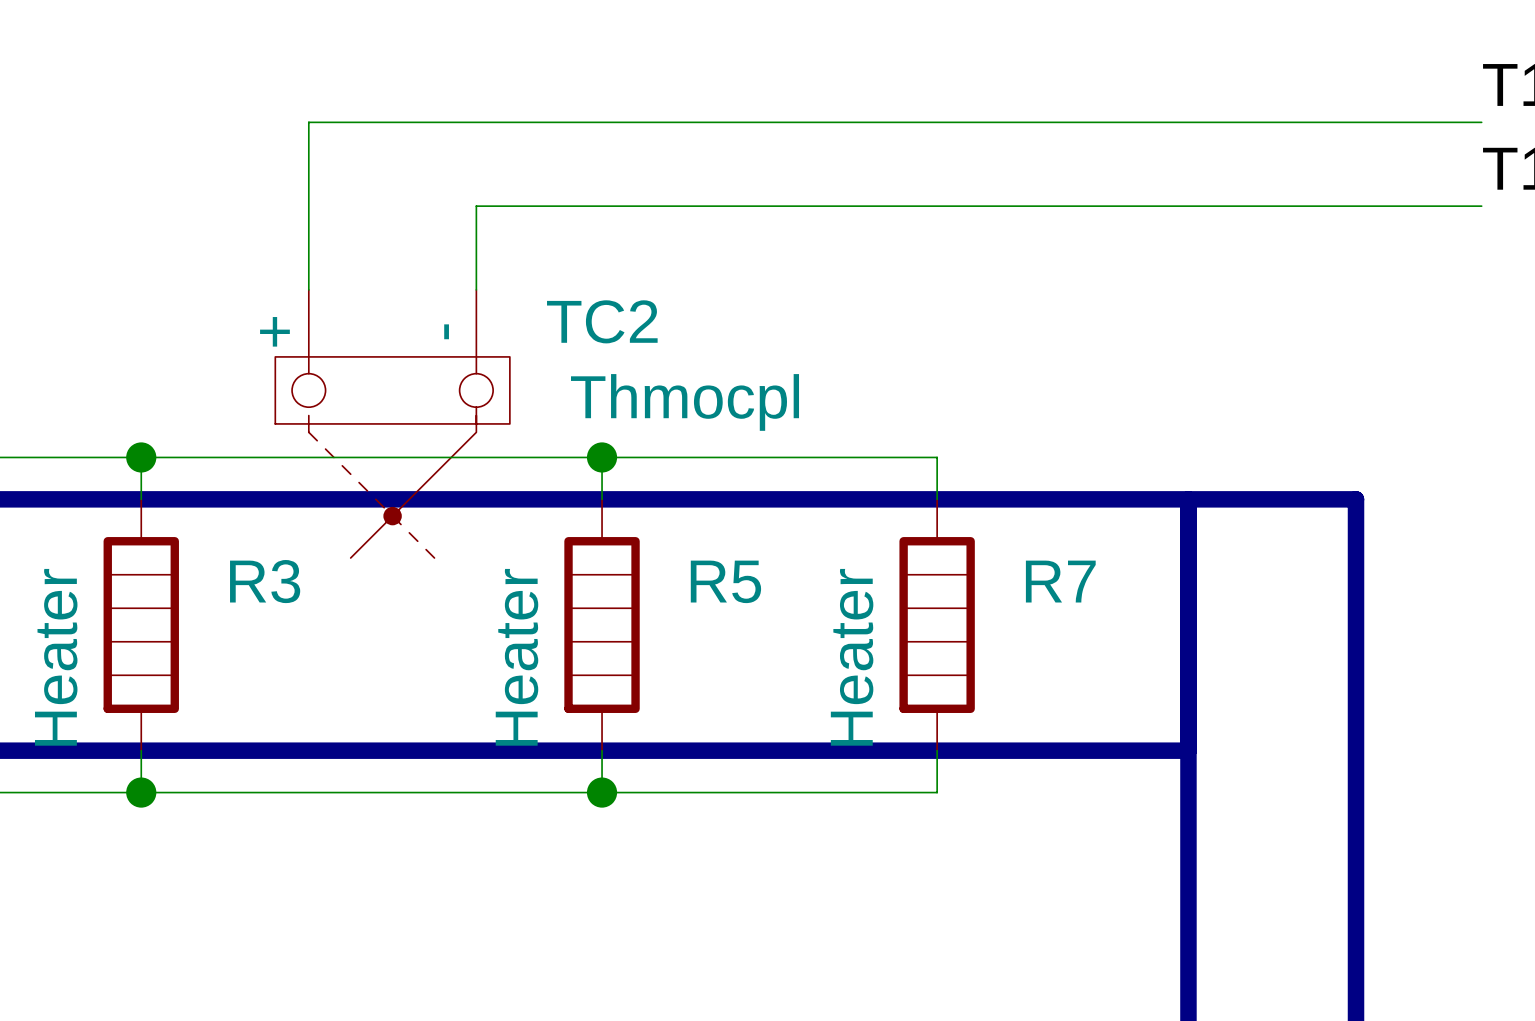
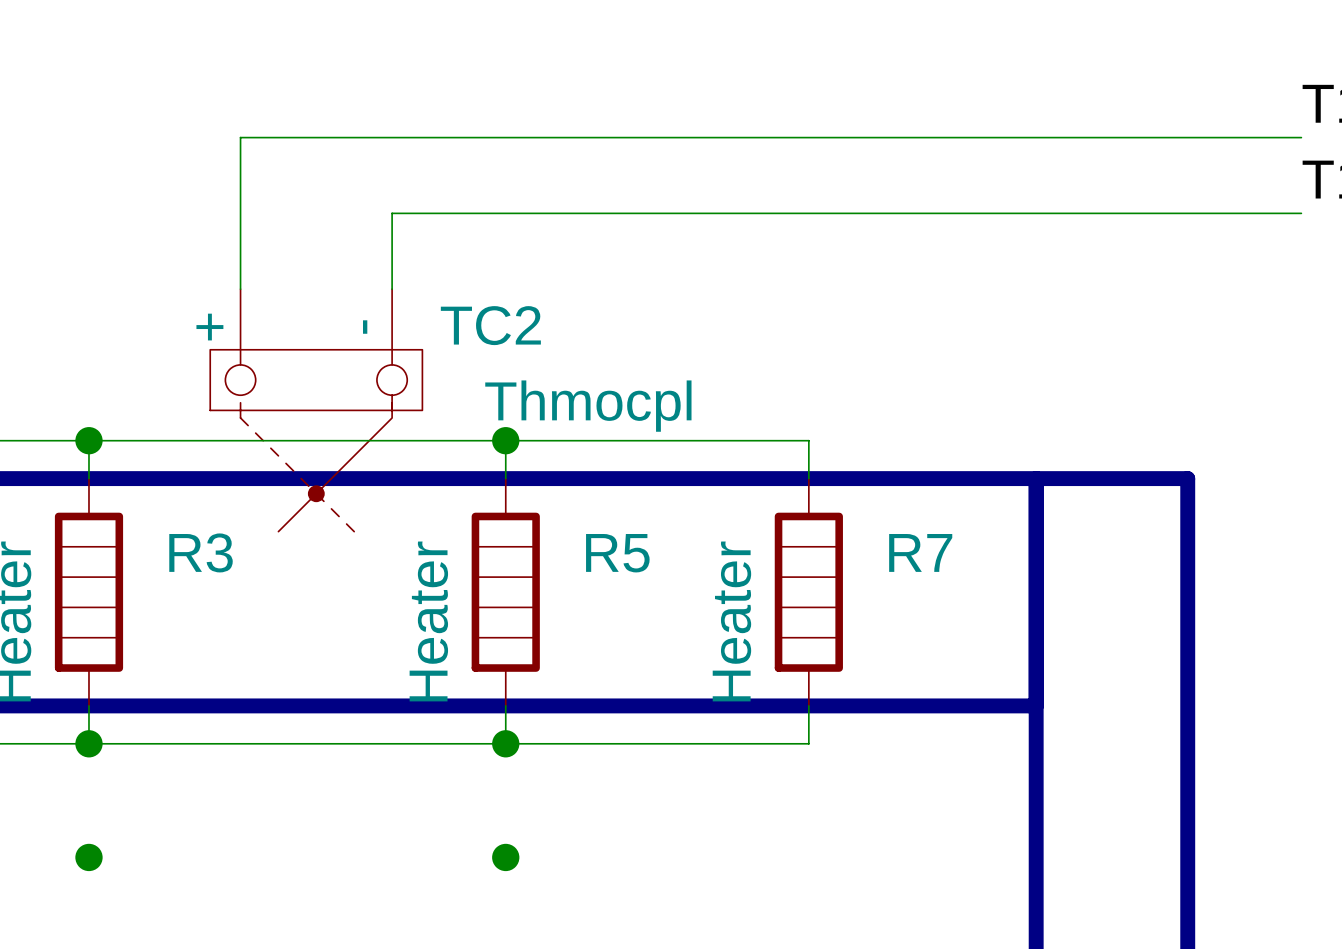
TC2 name position: TC2 (602, 321) -> TC2 (490, 325)
TC2 value position: Thmocpl (685, 402) -> Thmocpl (588, 406)
junction: none -> (88, 857)
junction: none -> (505, 857)

